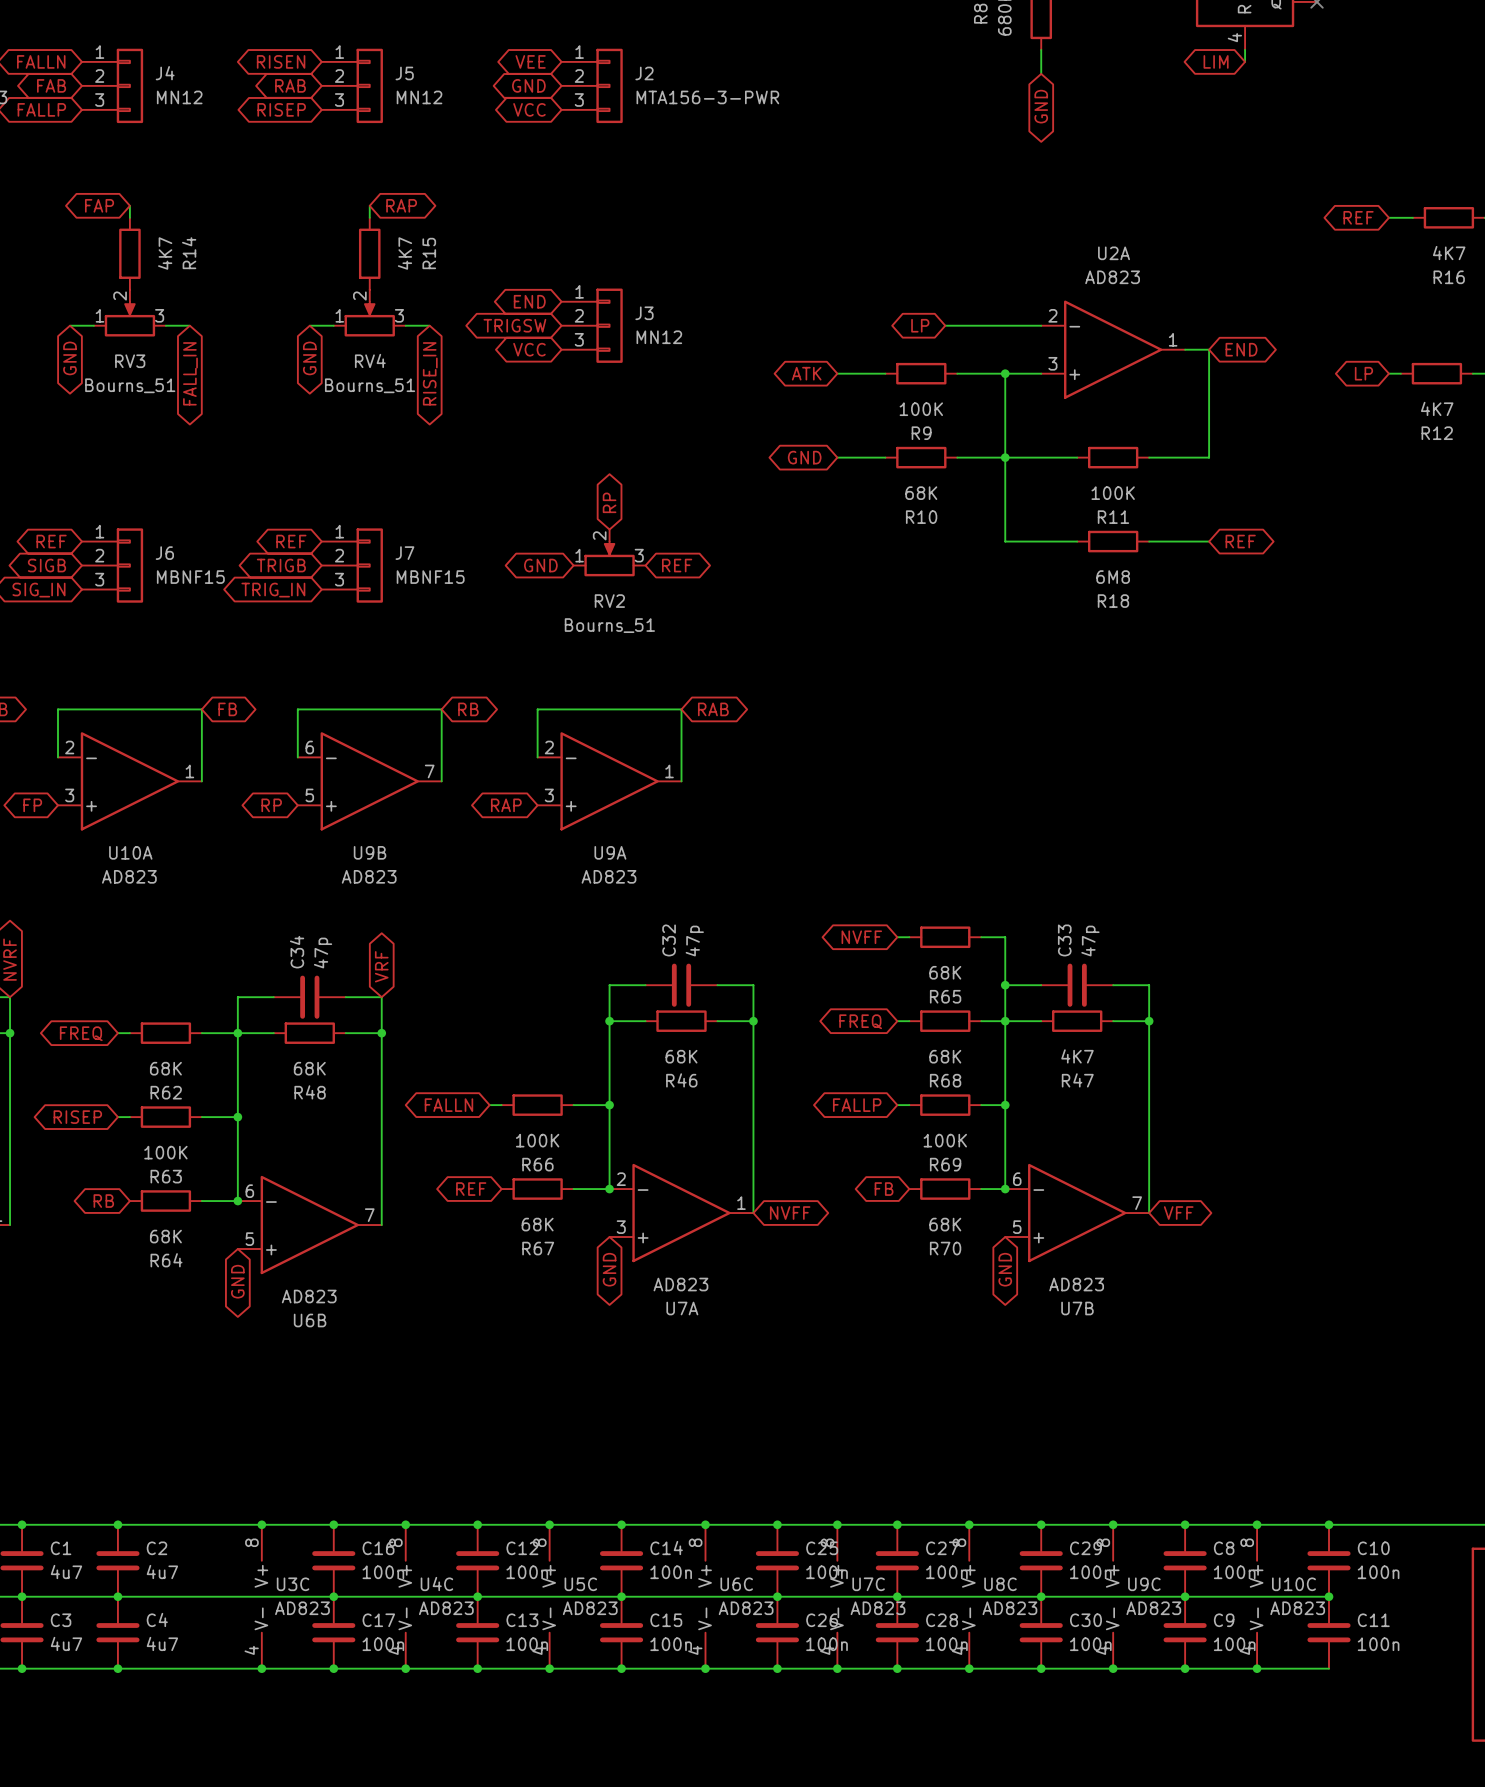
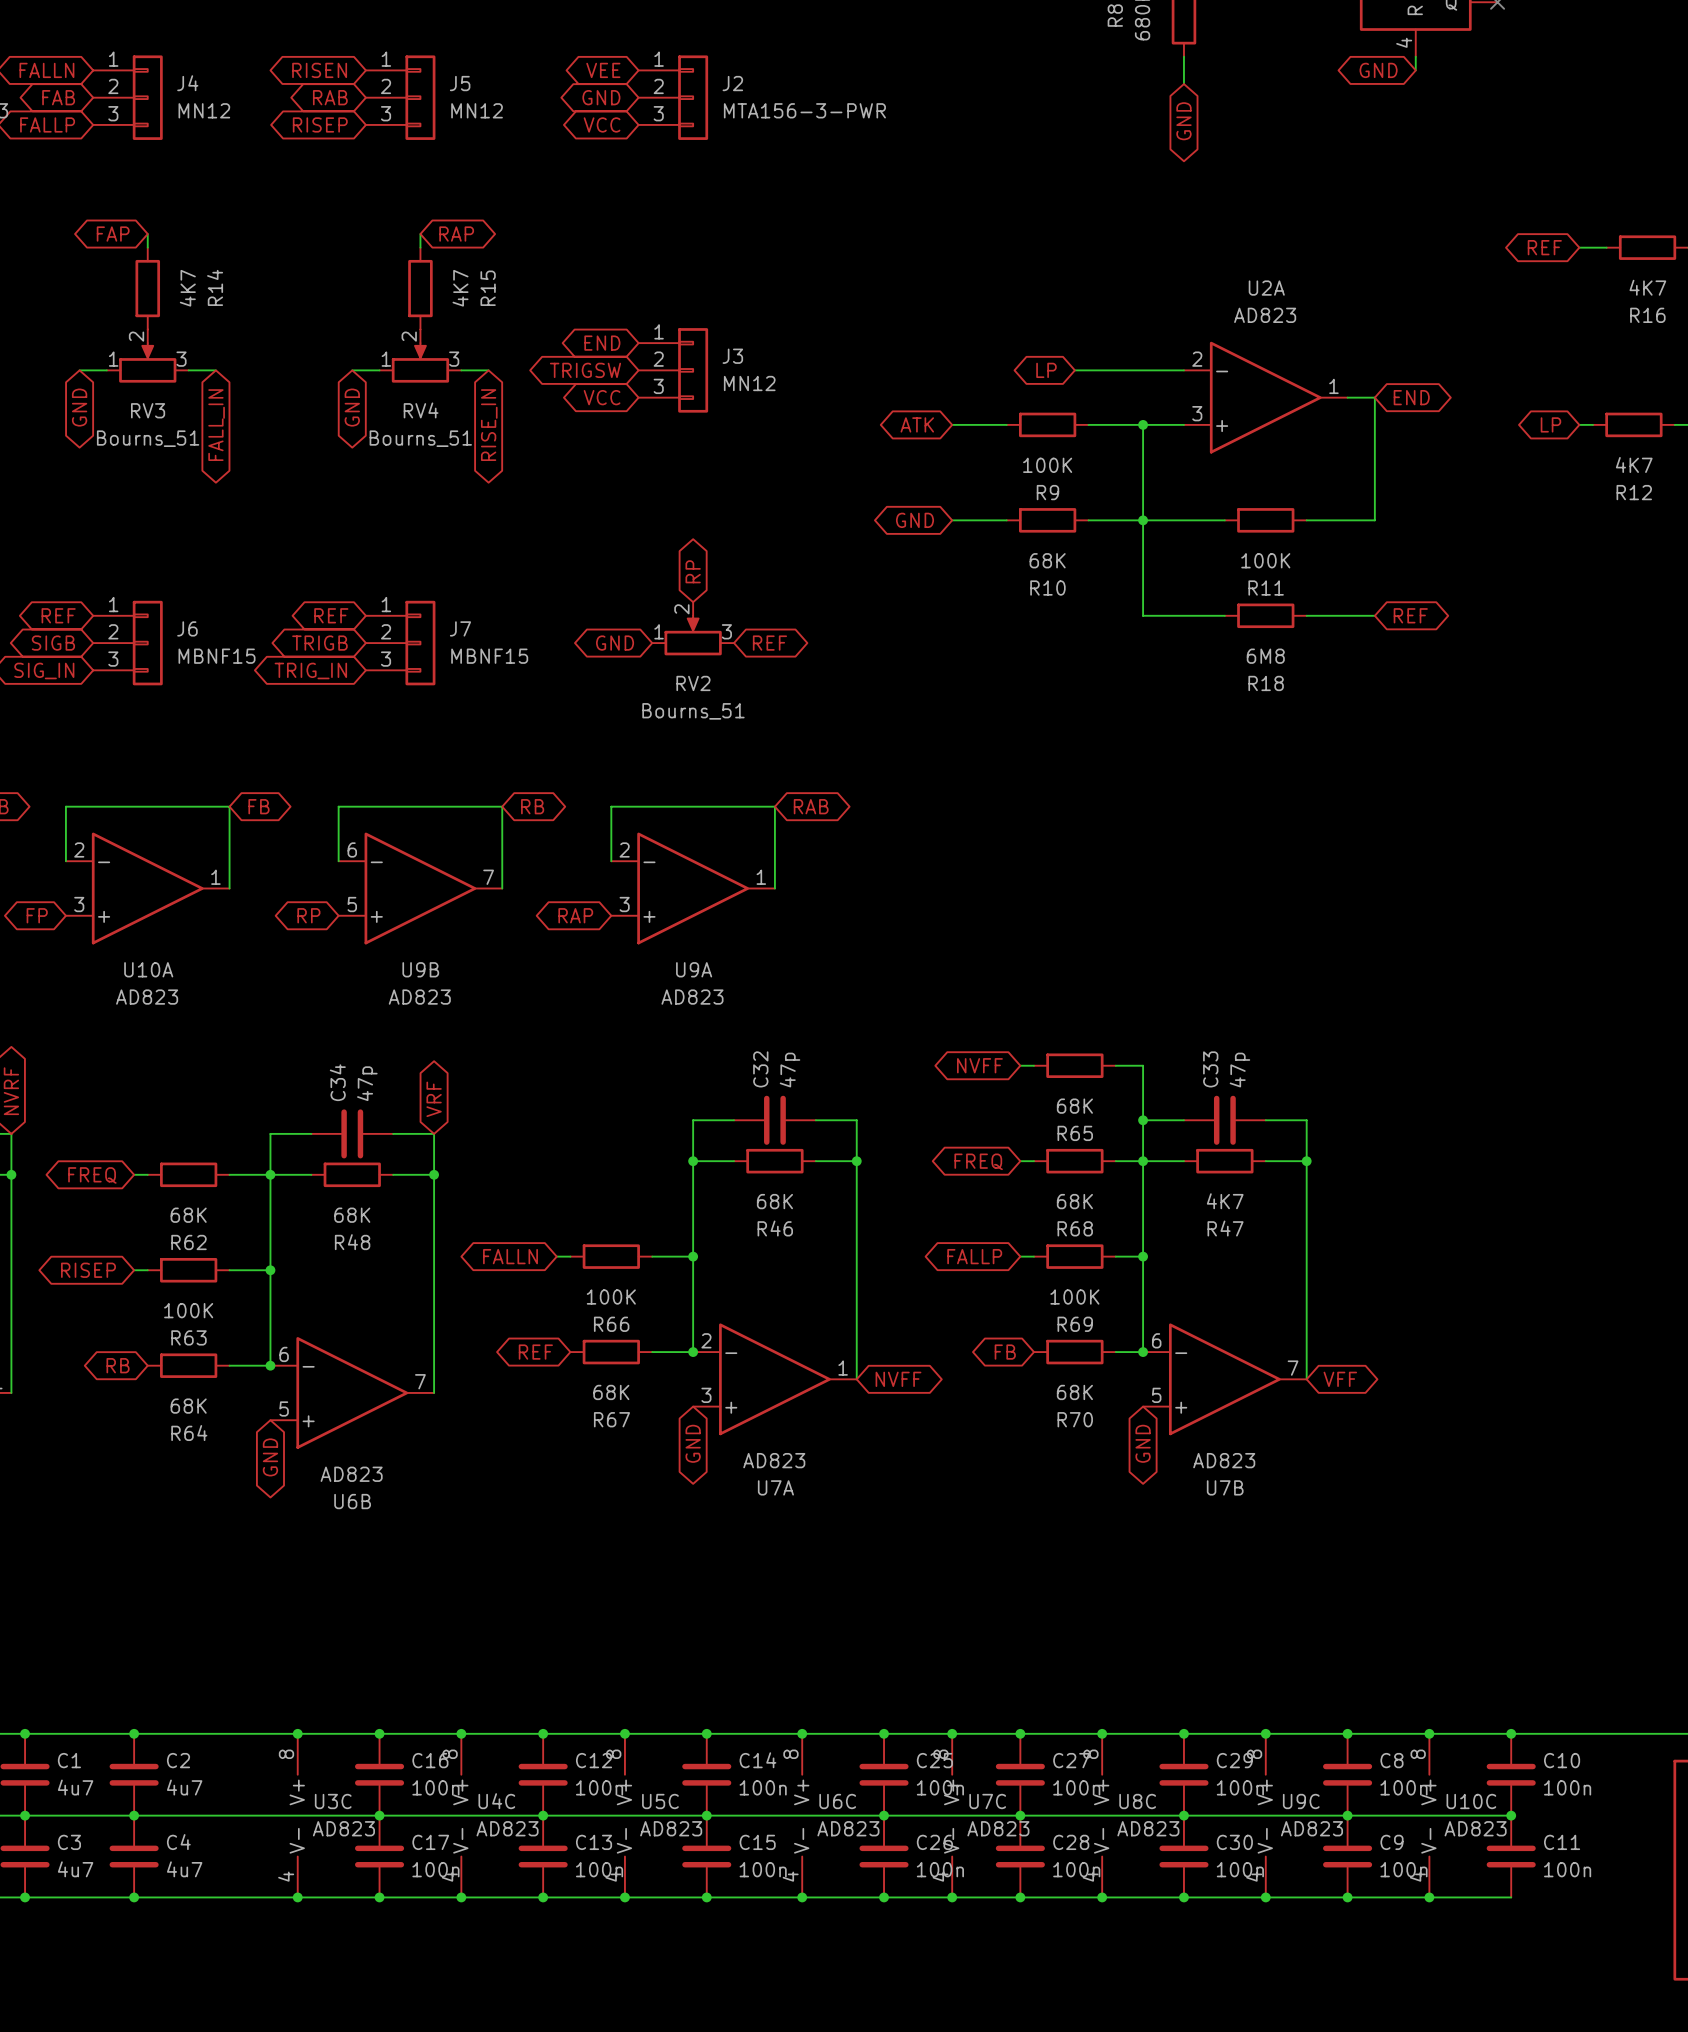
global label: LIM (1216, 61) -> GND (1378, 70)

